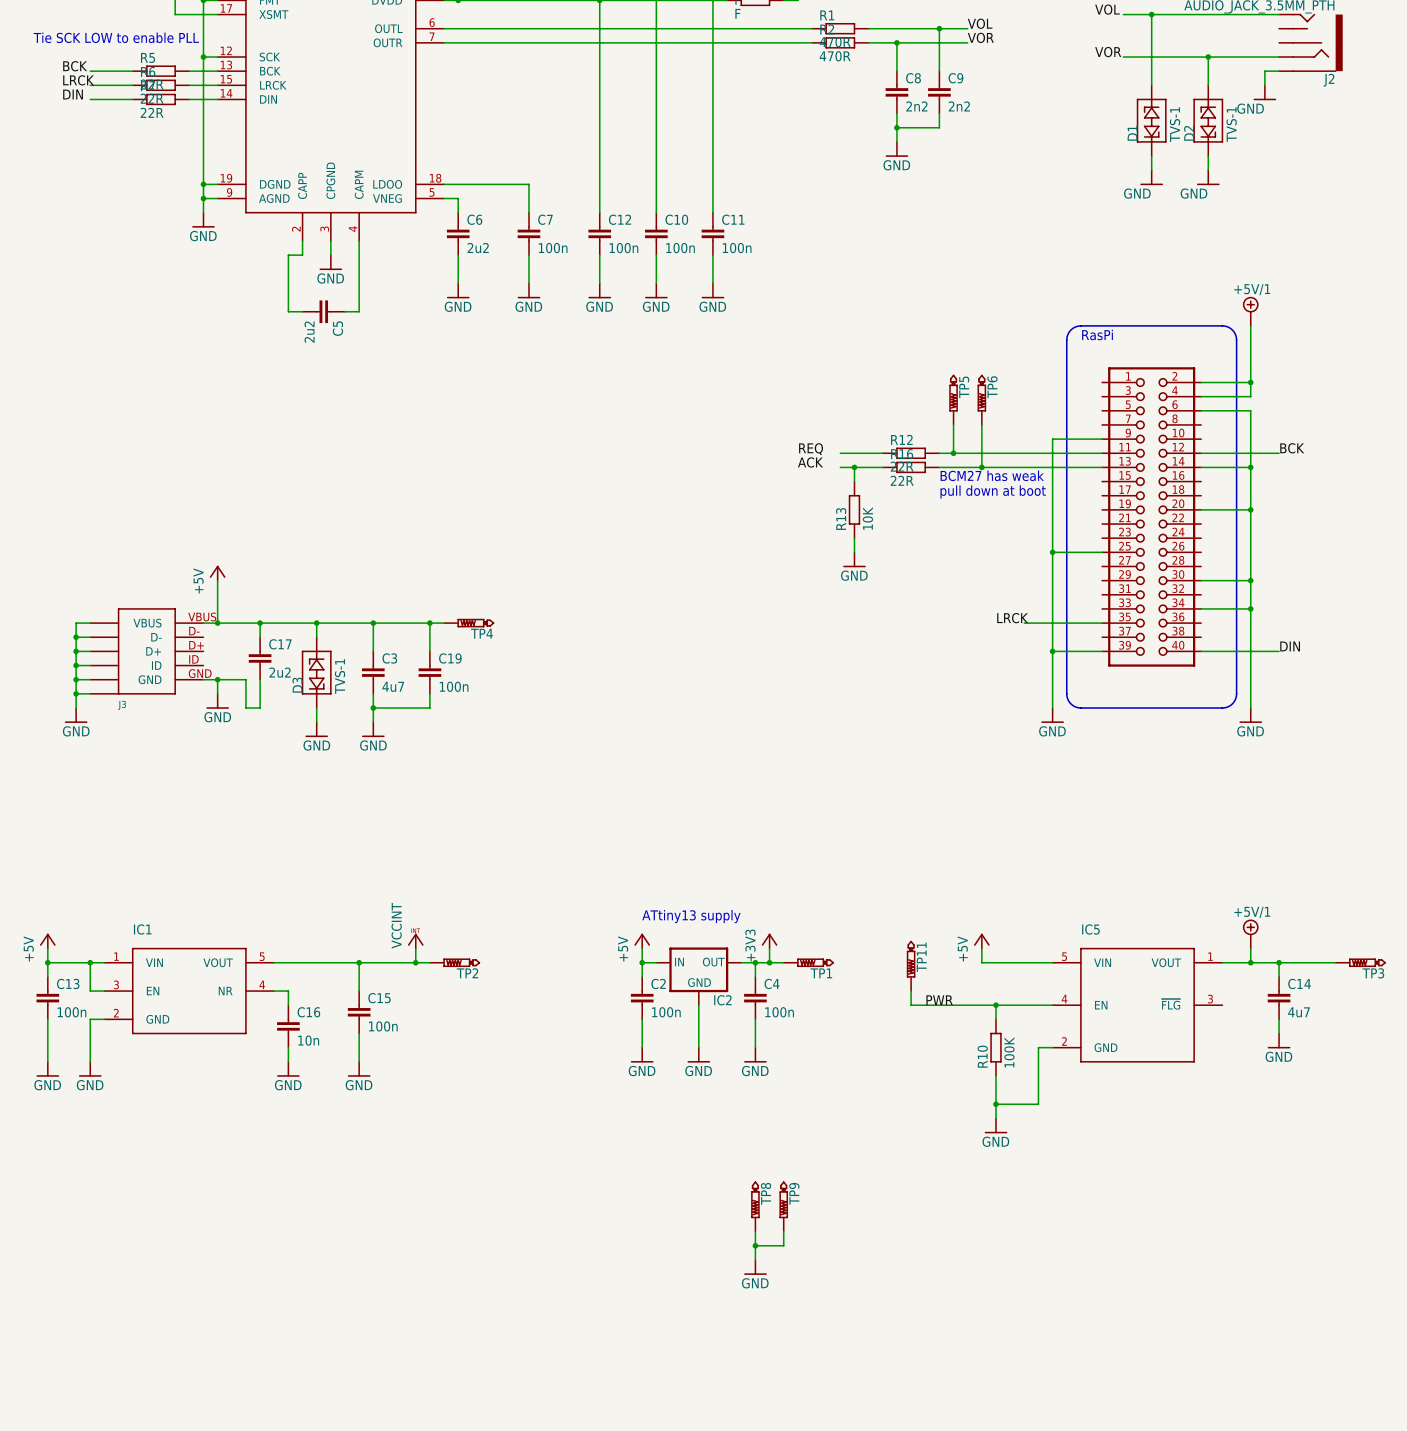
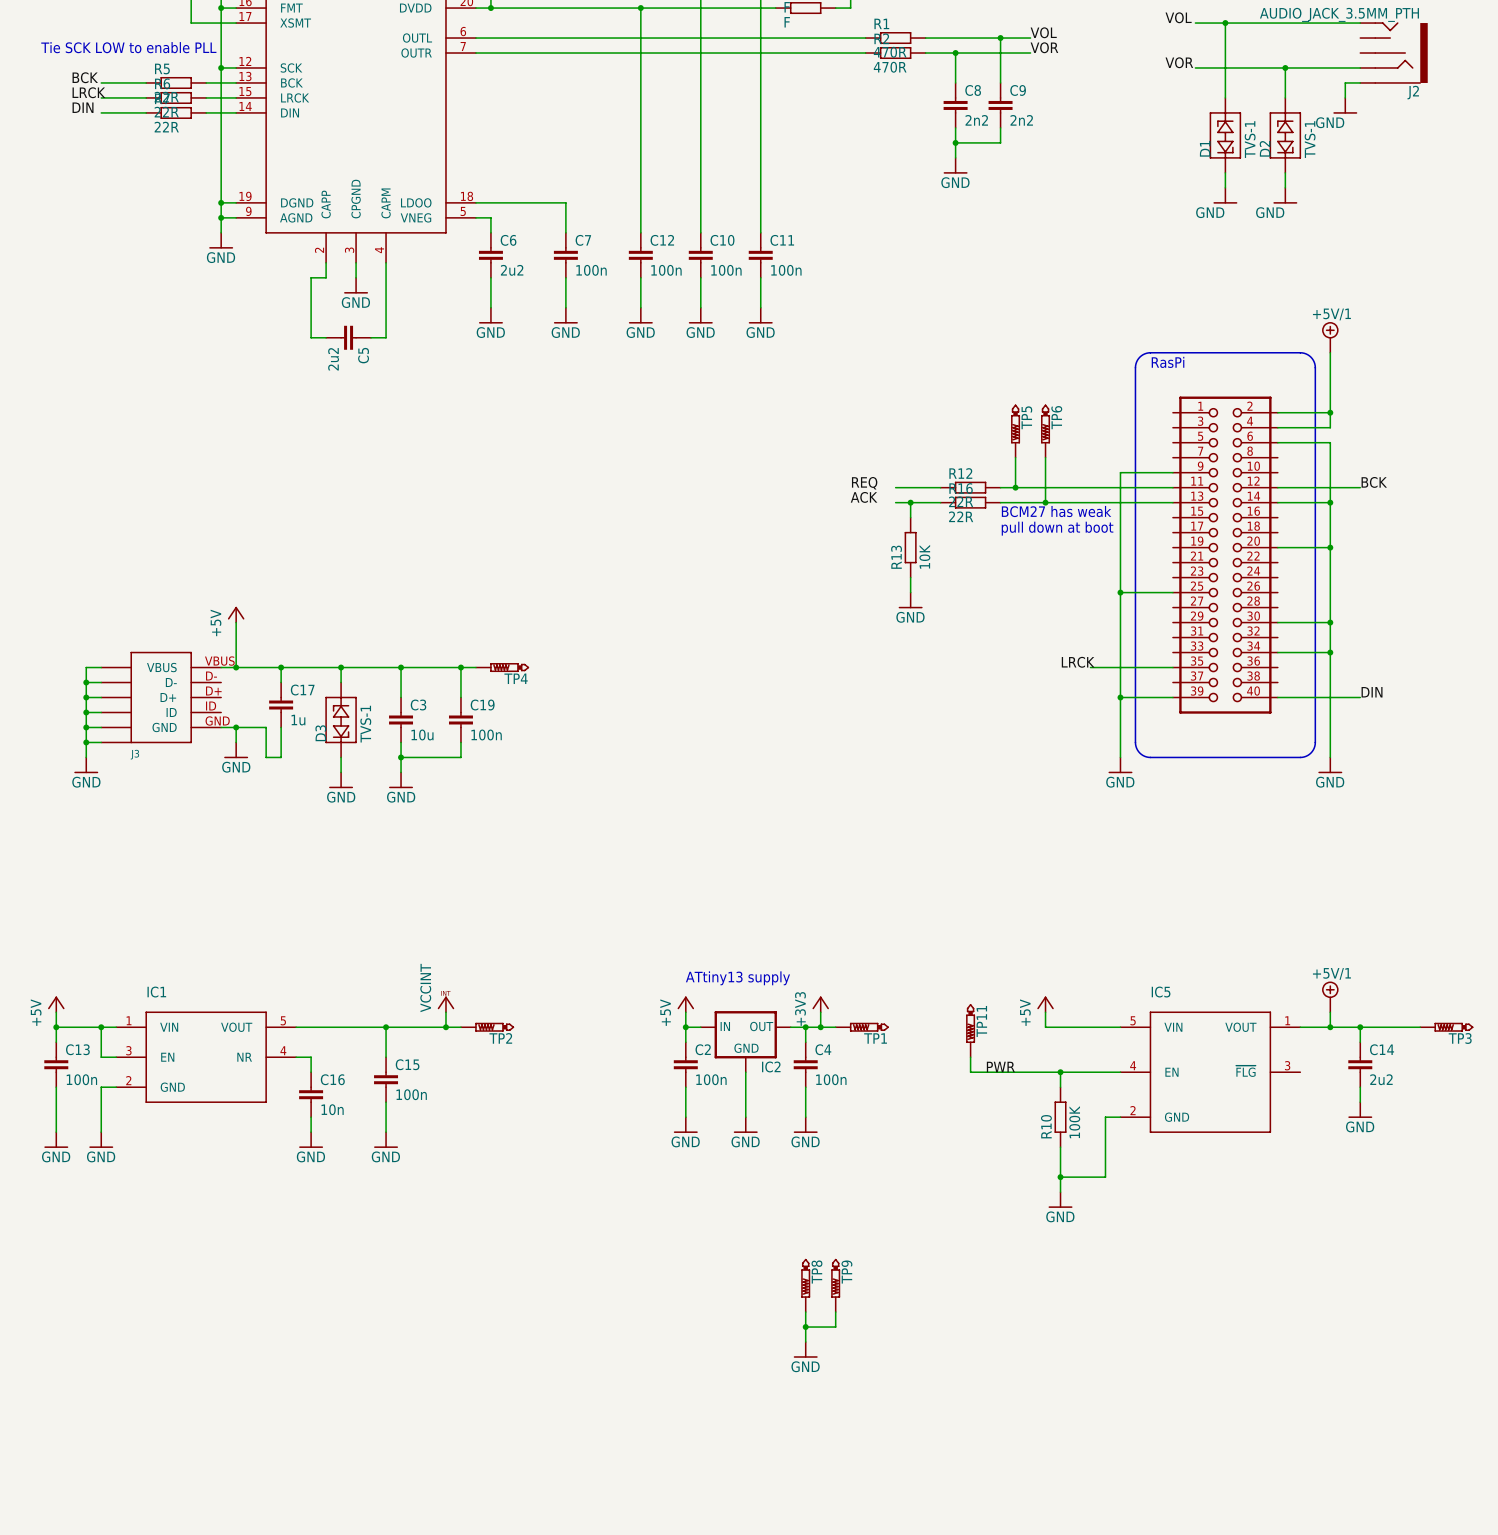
C17 value: 2u2 (280, 672) -> 1u (298, 720)
C3 value: 4u7 (393, 686) -> 10u (422, 734)
C14 value: 4u7 (1298, 1012) -> 2u2 (1381, 1079)

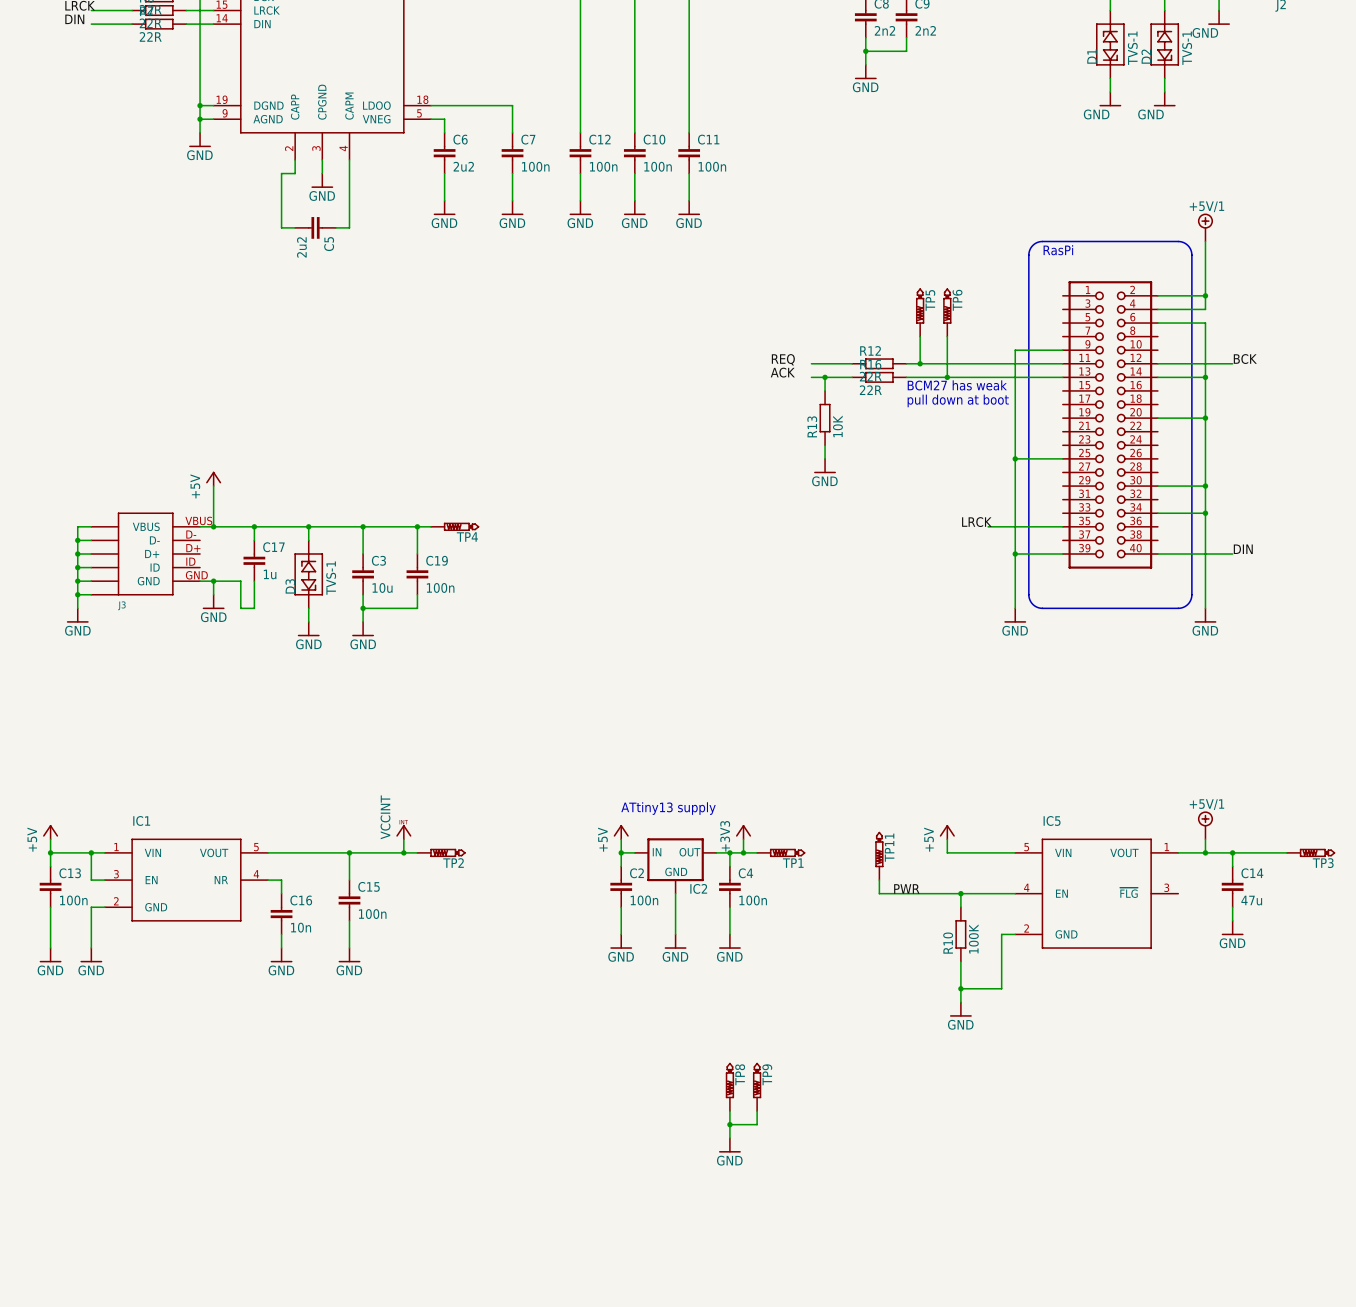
C14 value: 2u2 (1381, 1079) -> 47u (1251, 900)

